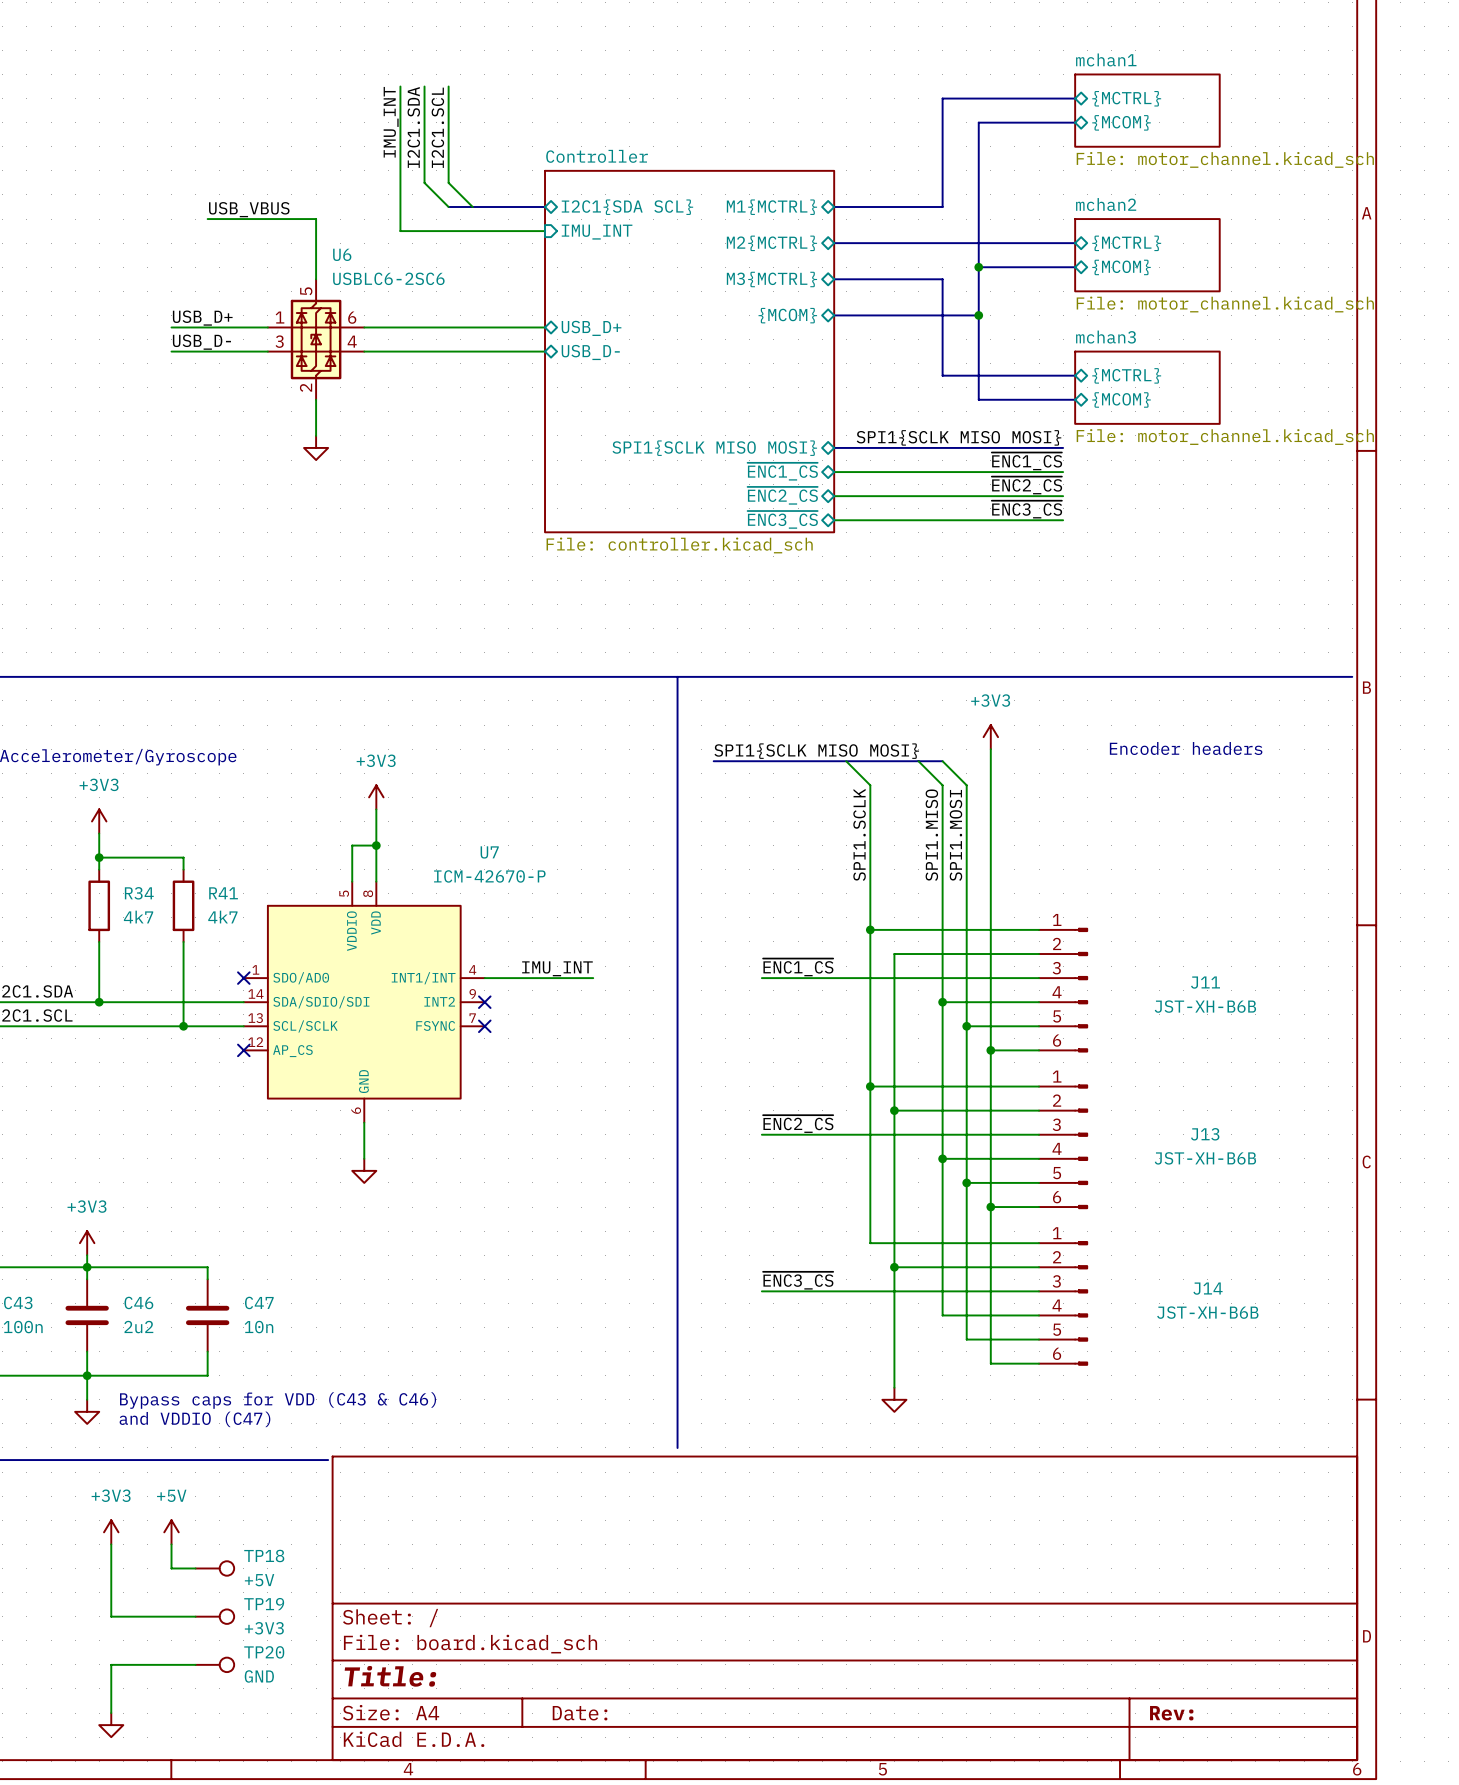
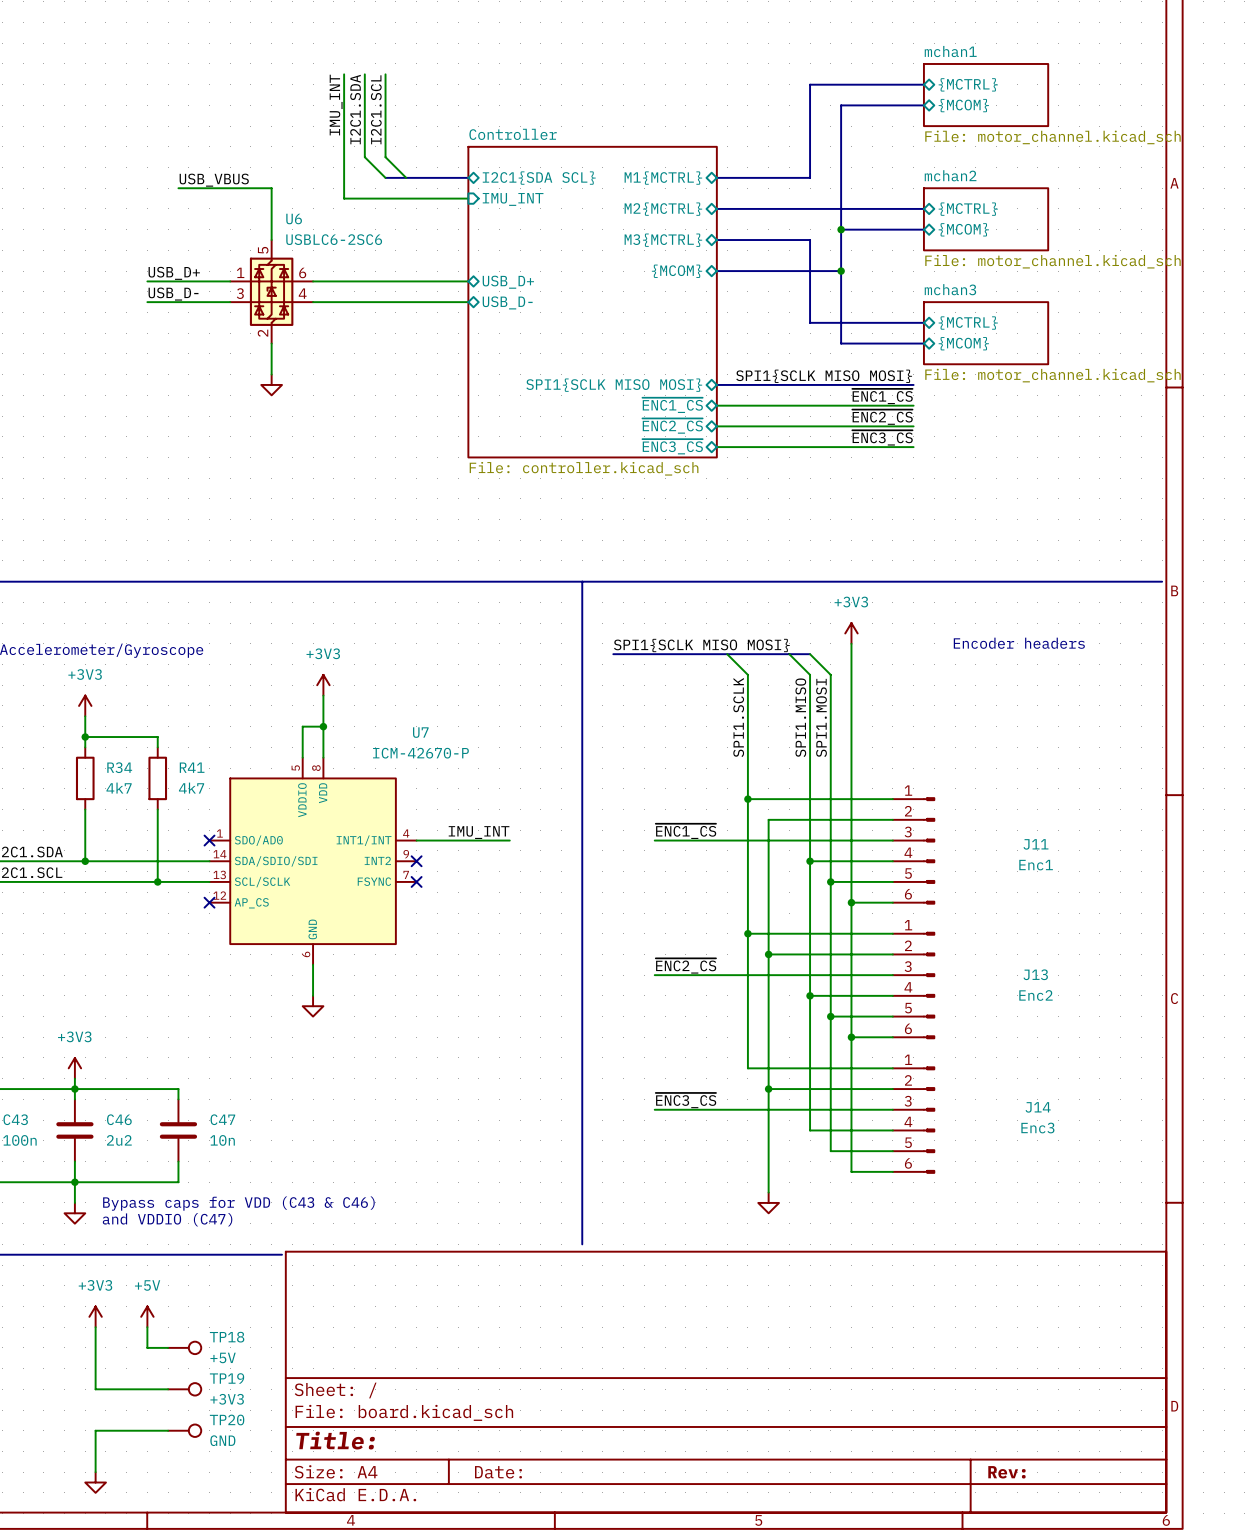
J11 value: JST-XH-B6B (1205, 1006) -> Enc1 (1036, 865)
J13 value: JST-XH-B6B (1205, 1158) -> Enc2 (1035, 995)
J14 value: JST-XH-B6B (1207, 1312) -> Enc3 (1037, 1128)

